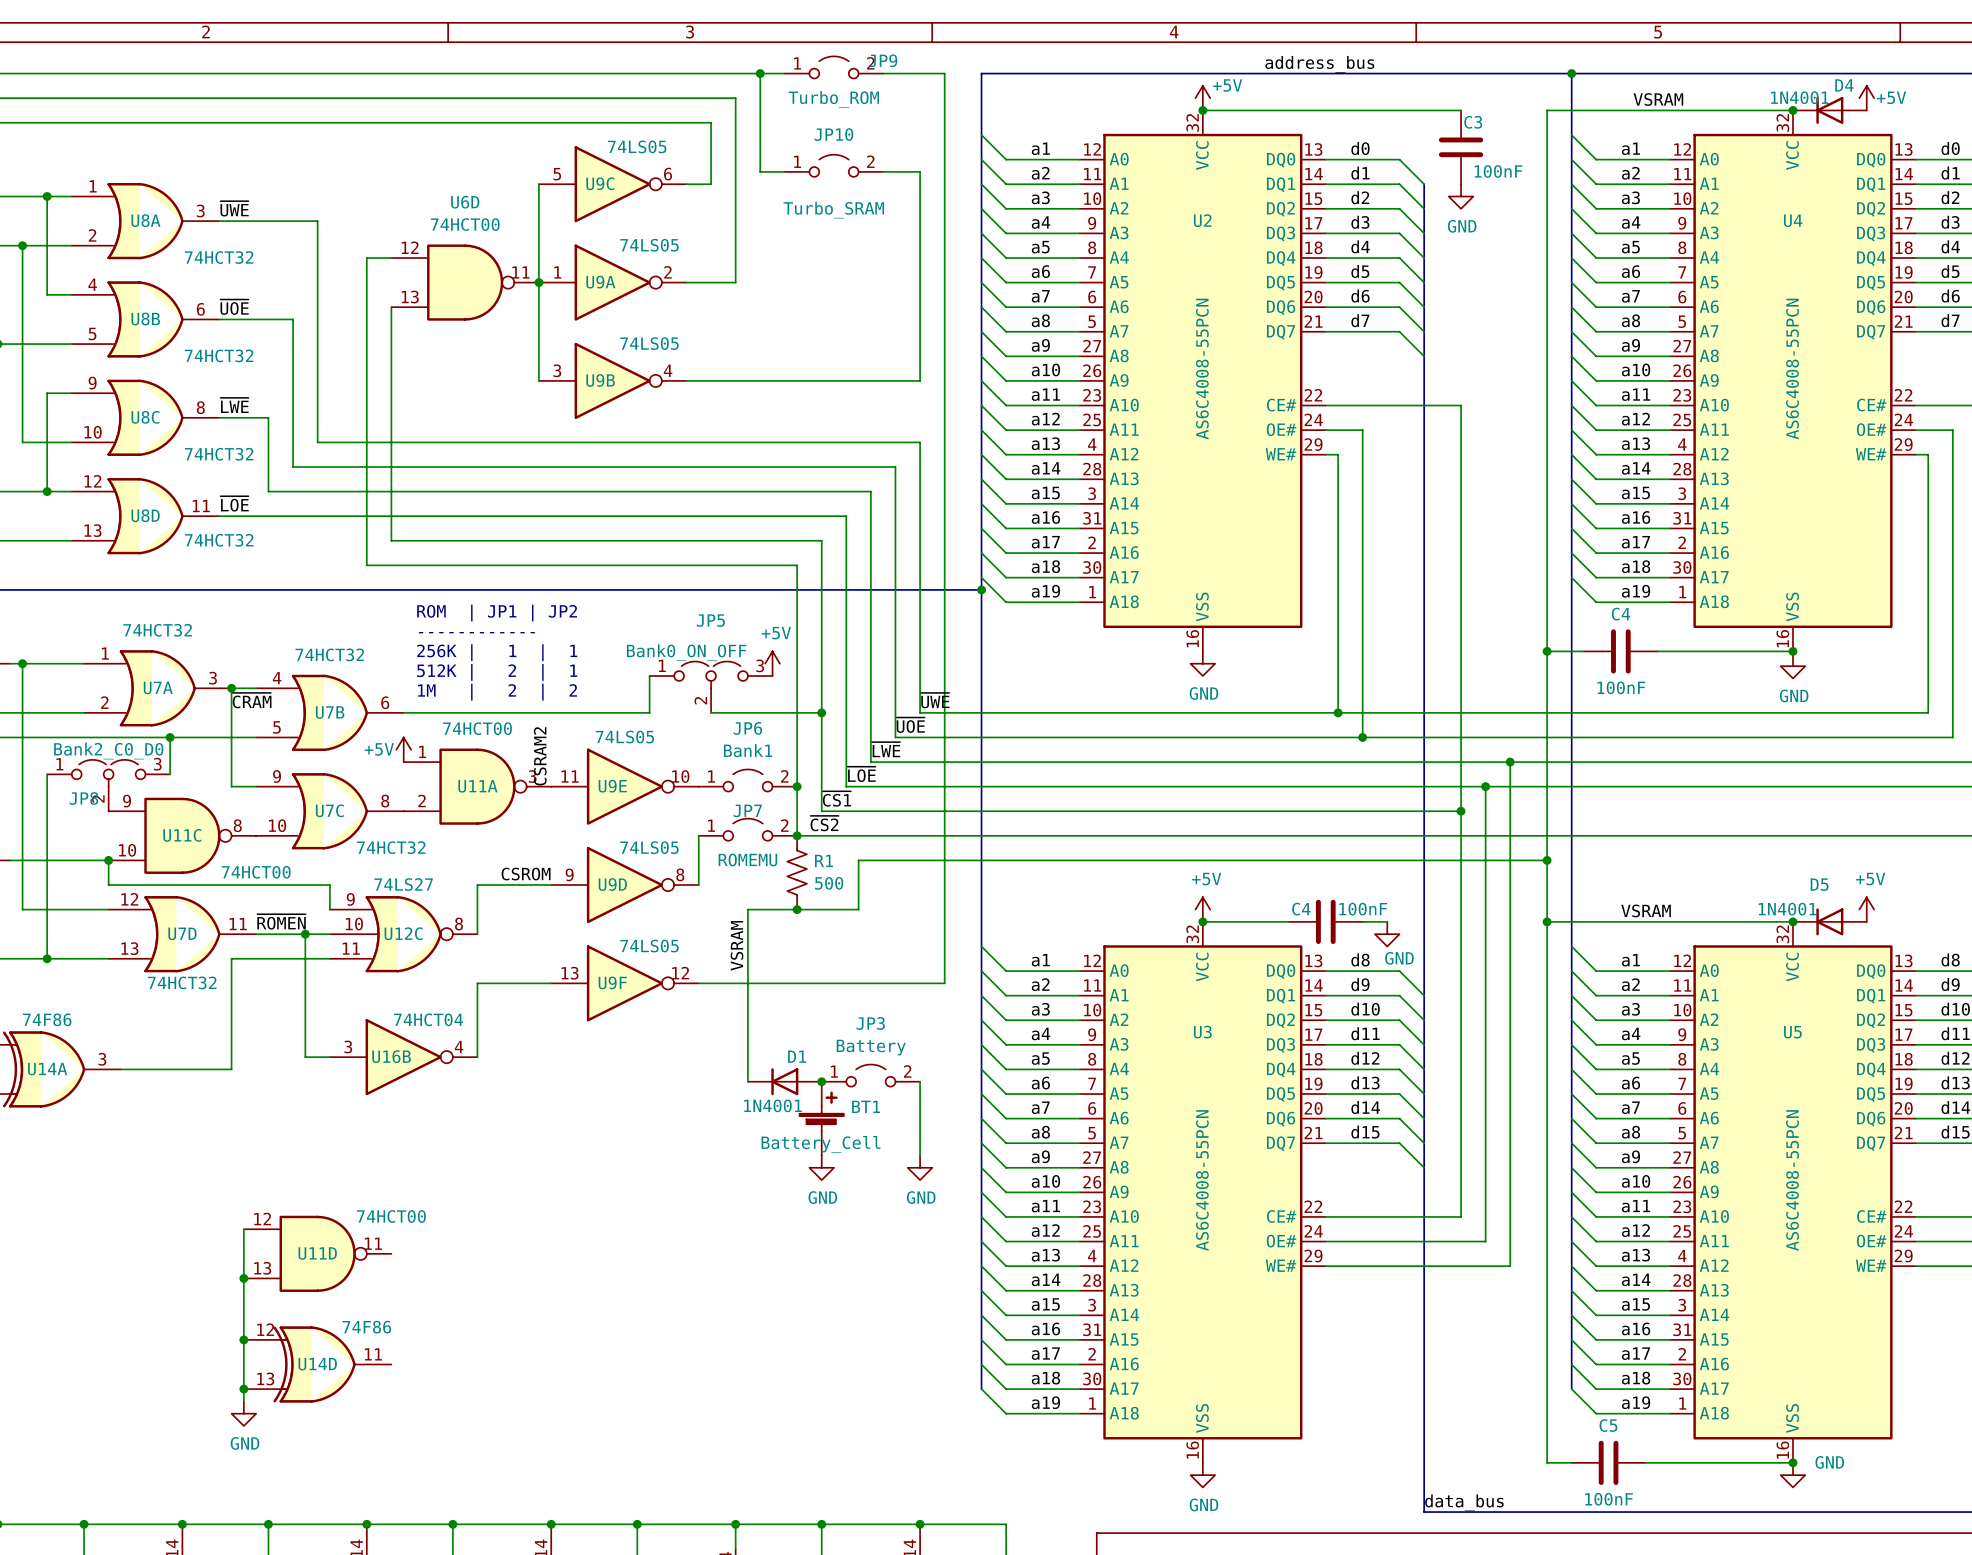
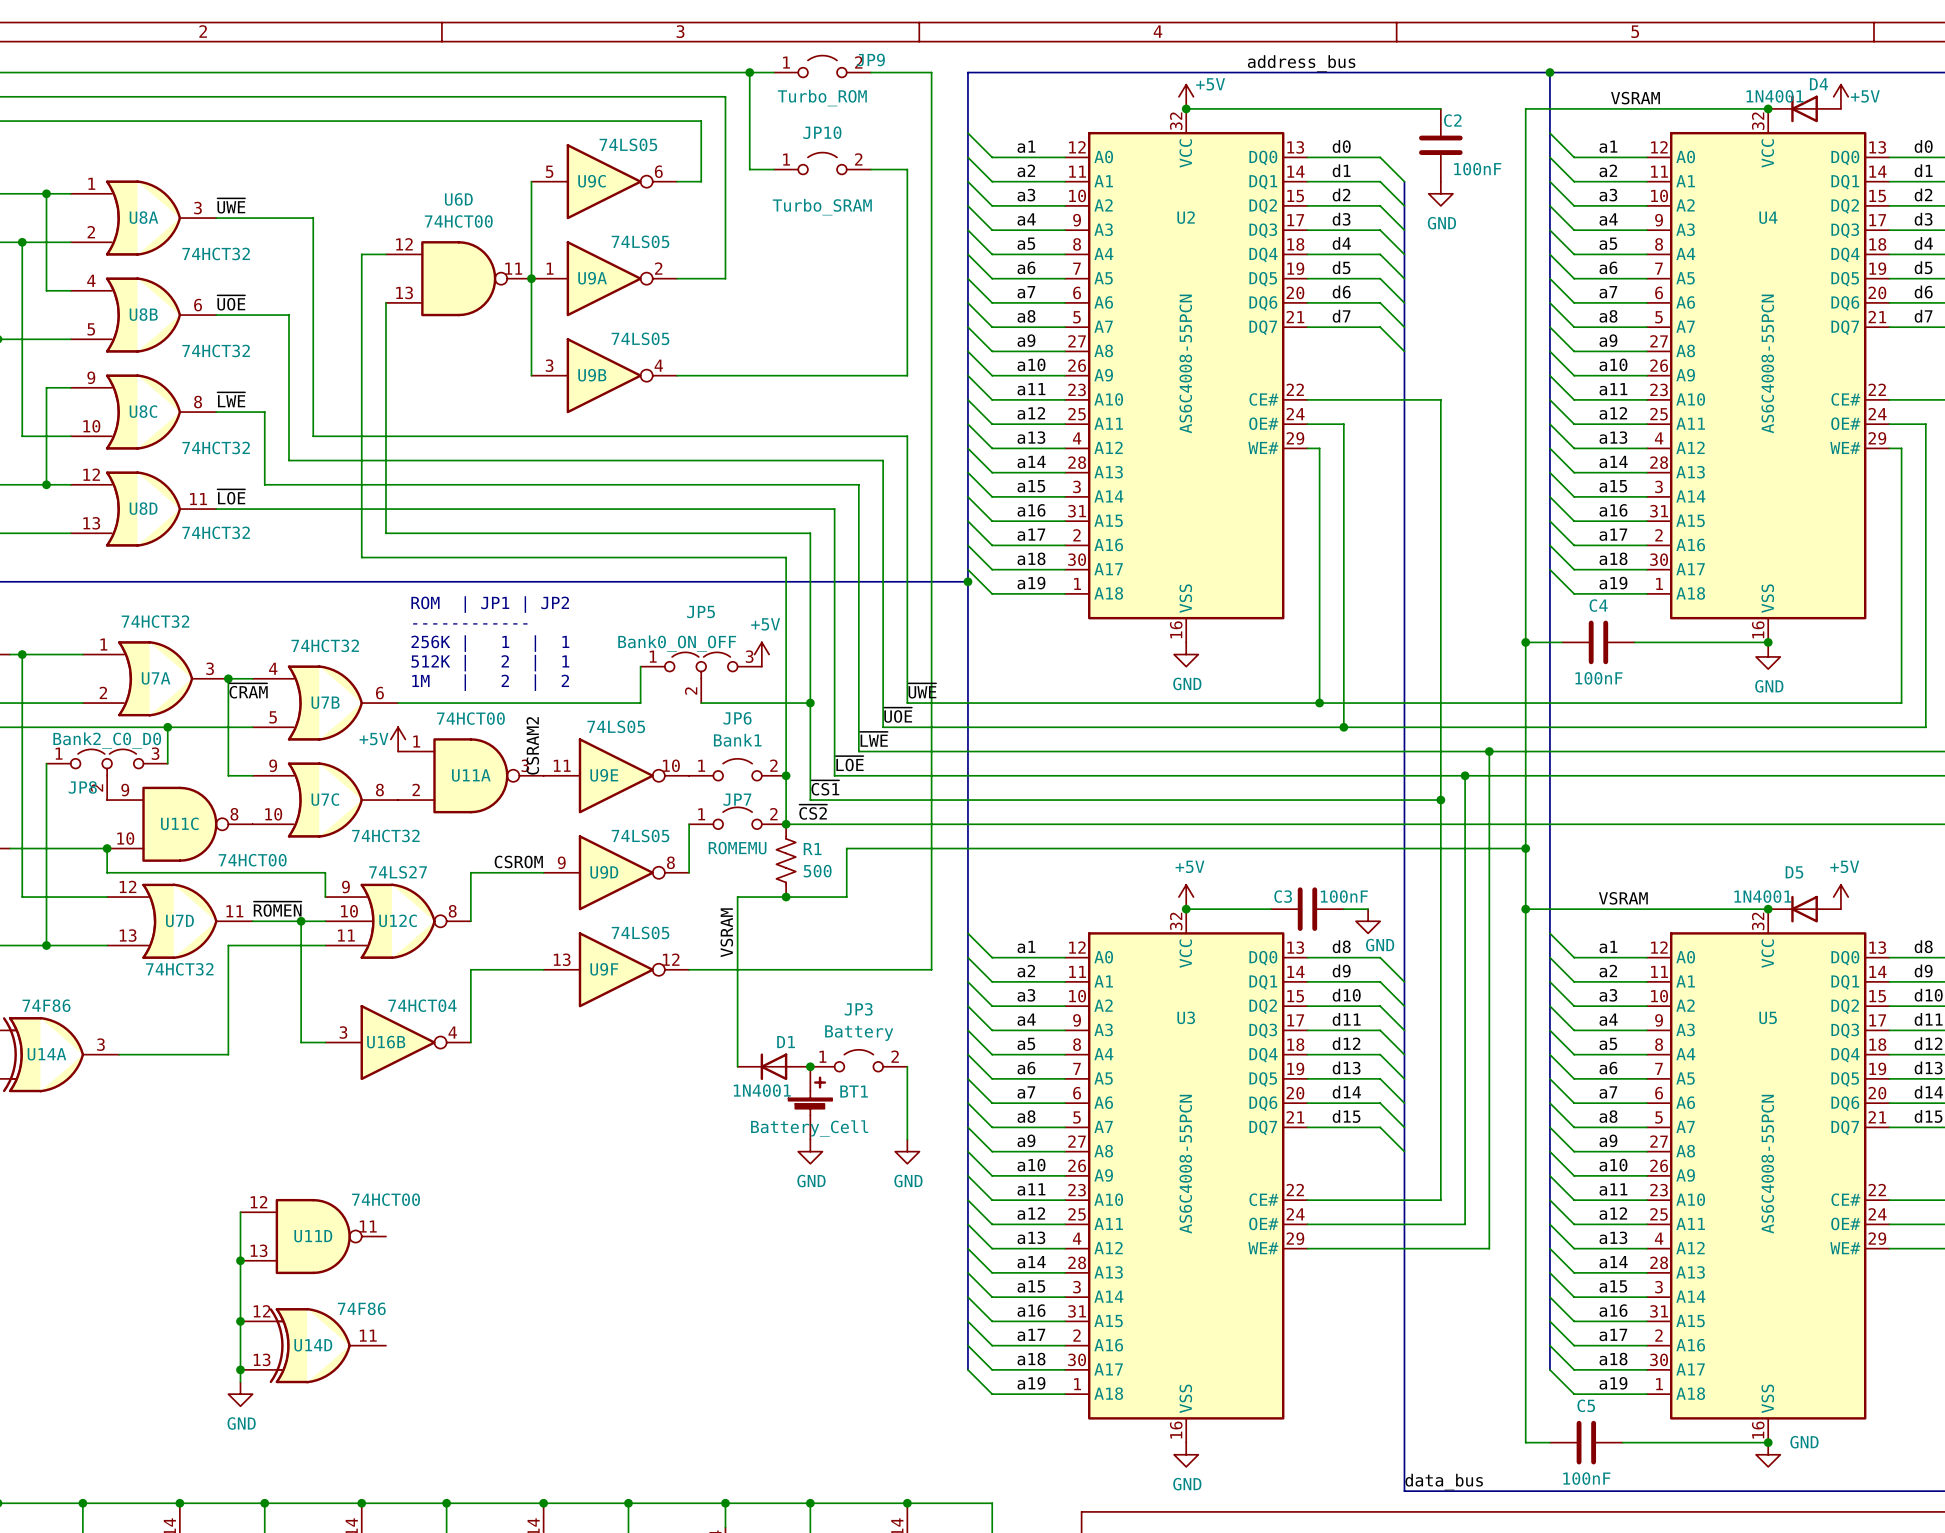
C3 name: C3 (1473, 122) -> C2 (1452, 120)
C4 name: C4 (1301, 909) -> C3 (1283, 896)

